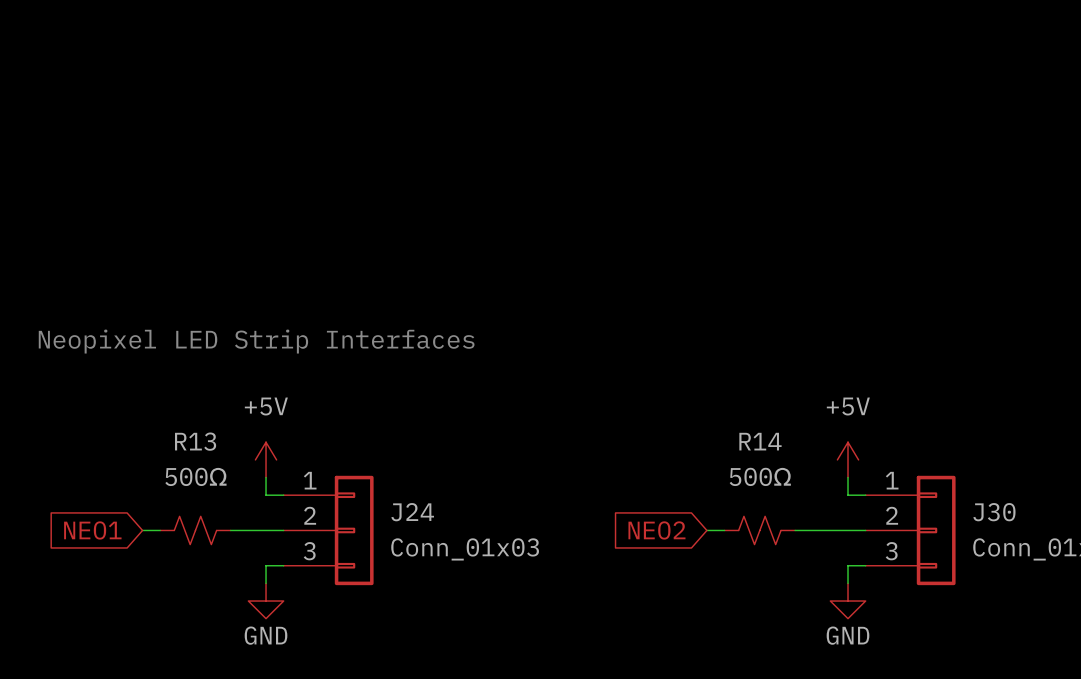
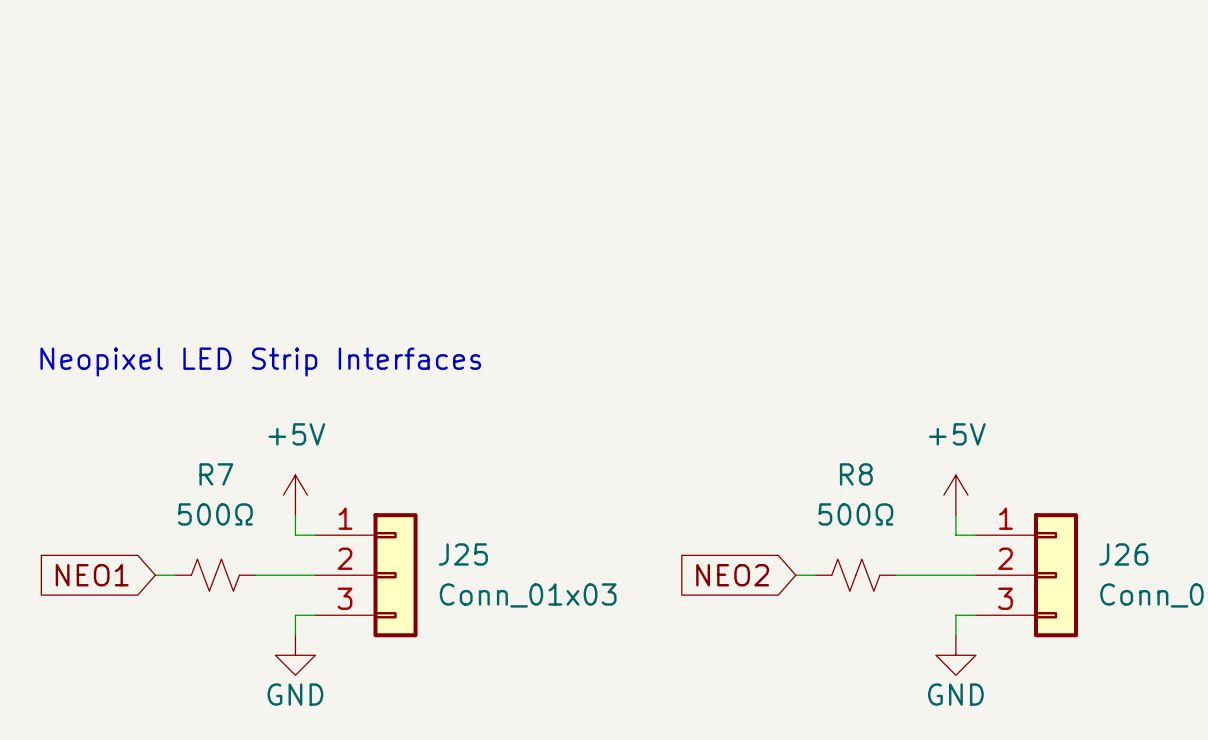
R13 name: R13 (195, 441) -> R7 (216, 474)
R14 name: R14 (760, 441) -> R8 (856, 474)
J24 name: J24 (412, 512) -> J25 (463, 554)
J30 name: J30 (994, 512) -> J26 (1123, 554)

